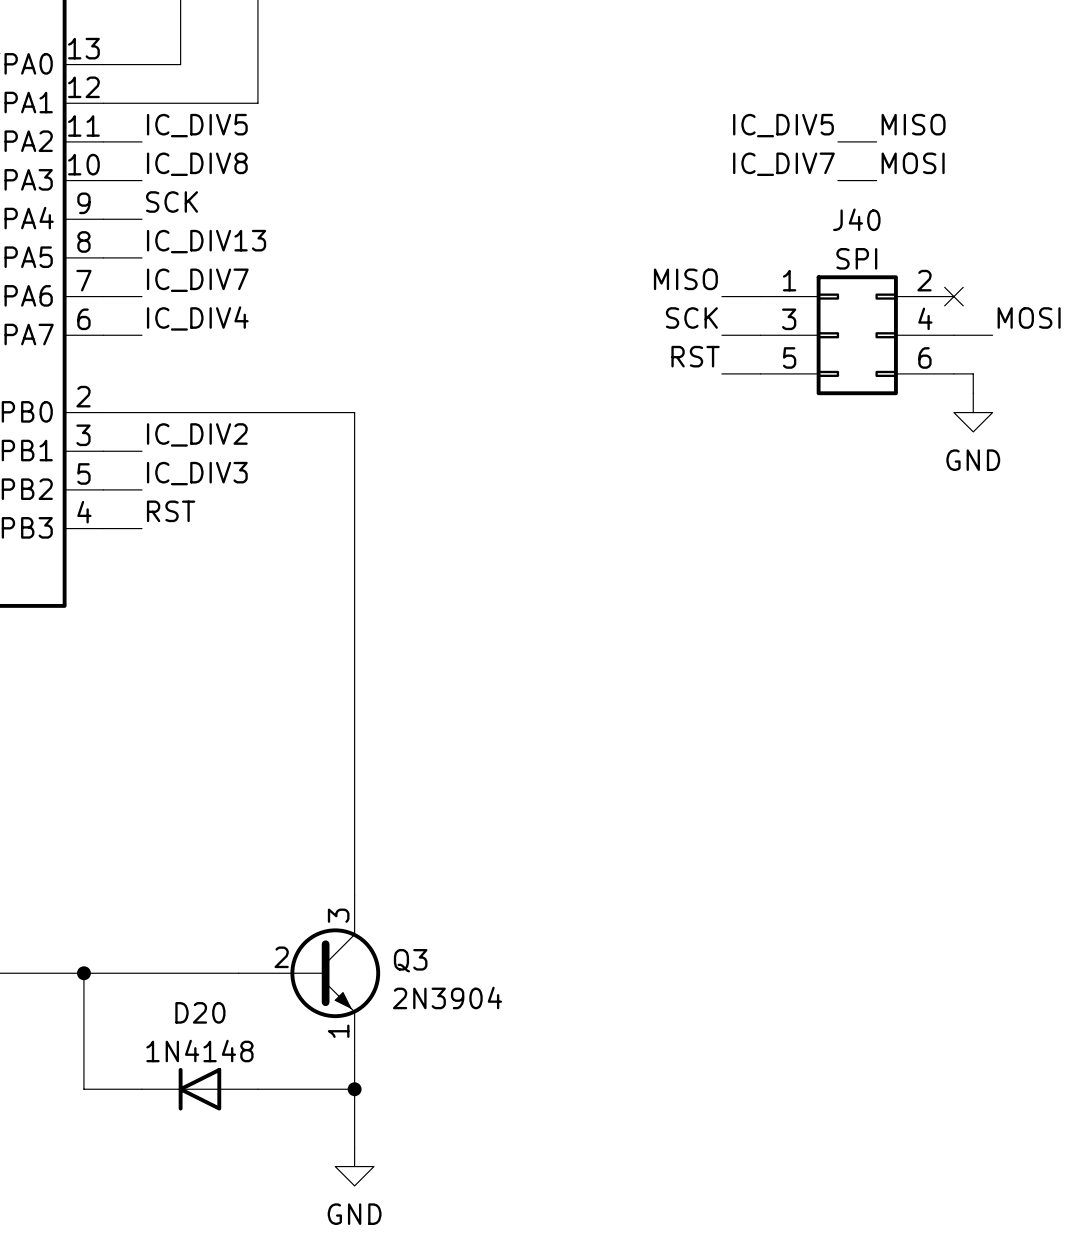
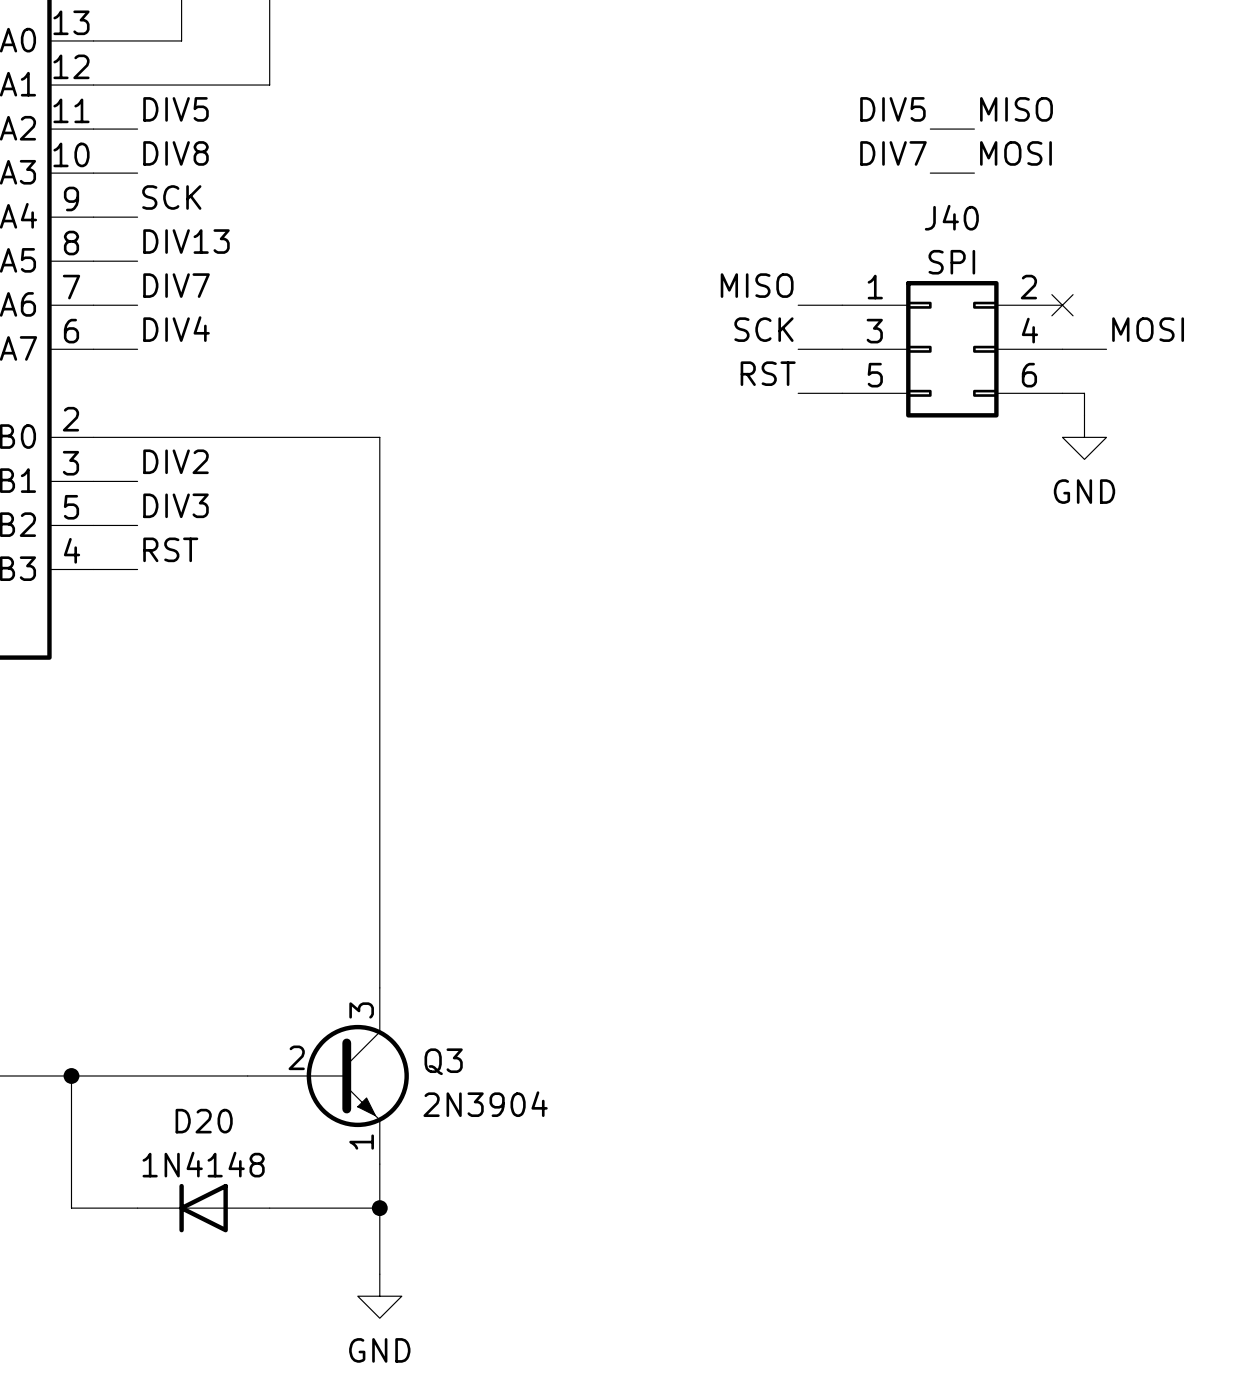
label: IC_DIV5 (197, 125) -> DIV5 (175, 109)
label: IC_DIV5 (783, 125) -> DIV5 (892, 109)
label: IC_DIV8 (197, 164) -> DIV8 (175, 153)
label: IC_DIV7 (783, 164) -> DIV7 (893, 153)
label: IC_DIV13 (206, 241) -> DIV13 (186, 241)
label: IC_DIV7 (197, 280) -> DIV7 (176, 285)
label: IC_DIV4 (197, 318) -> DIV4 (176, 329)
label: IC_DIV2 (197, 434) -> DIV2 (175, 461)
label: IC_DIV3 (197, 473) -> DIV3 (175, 505)

